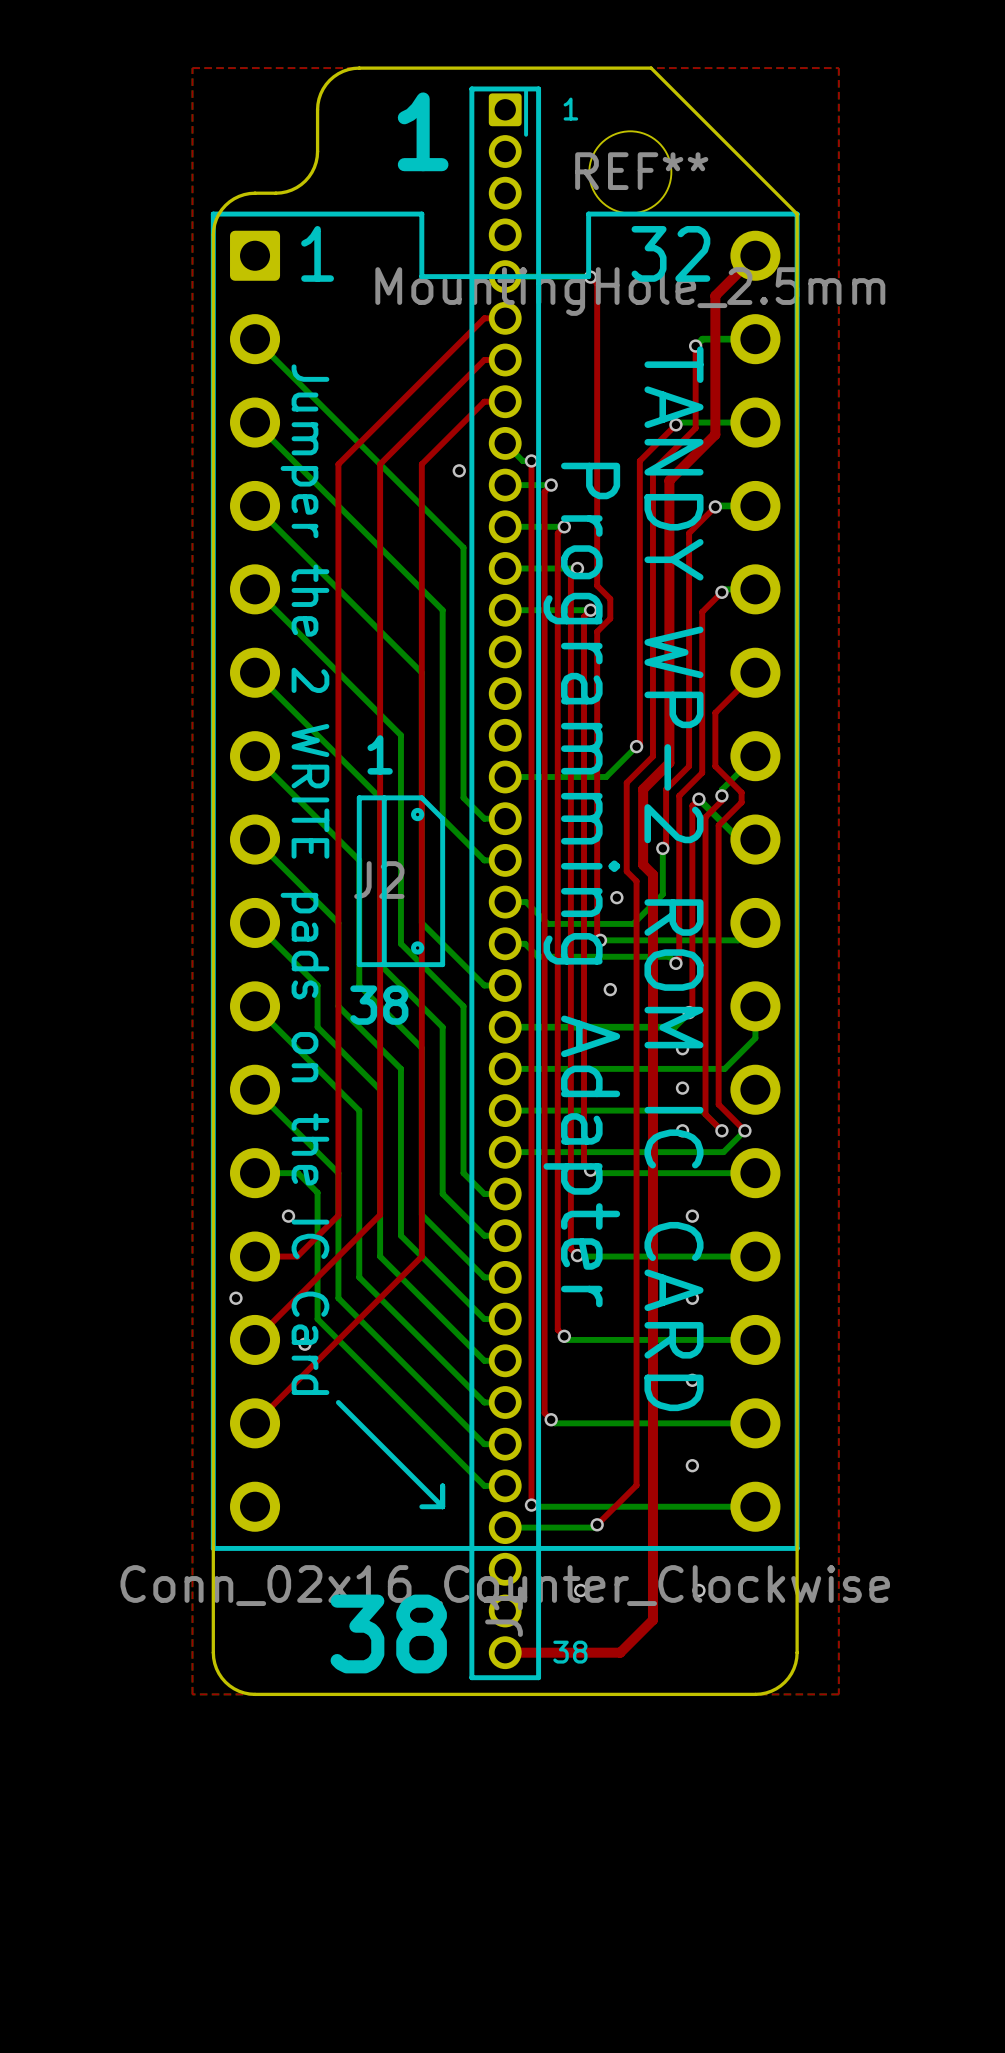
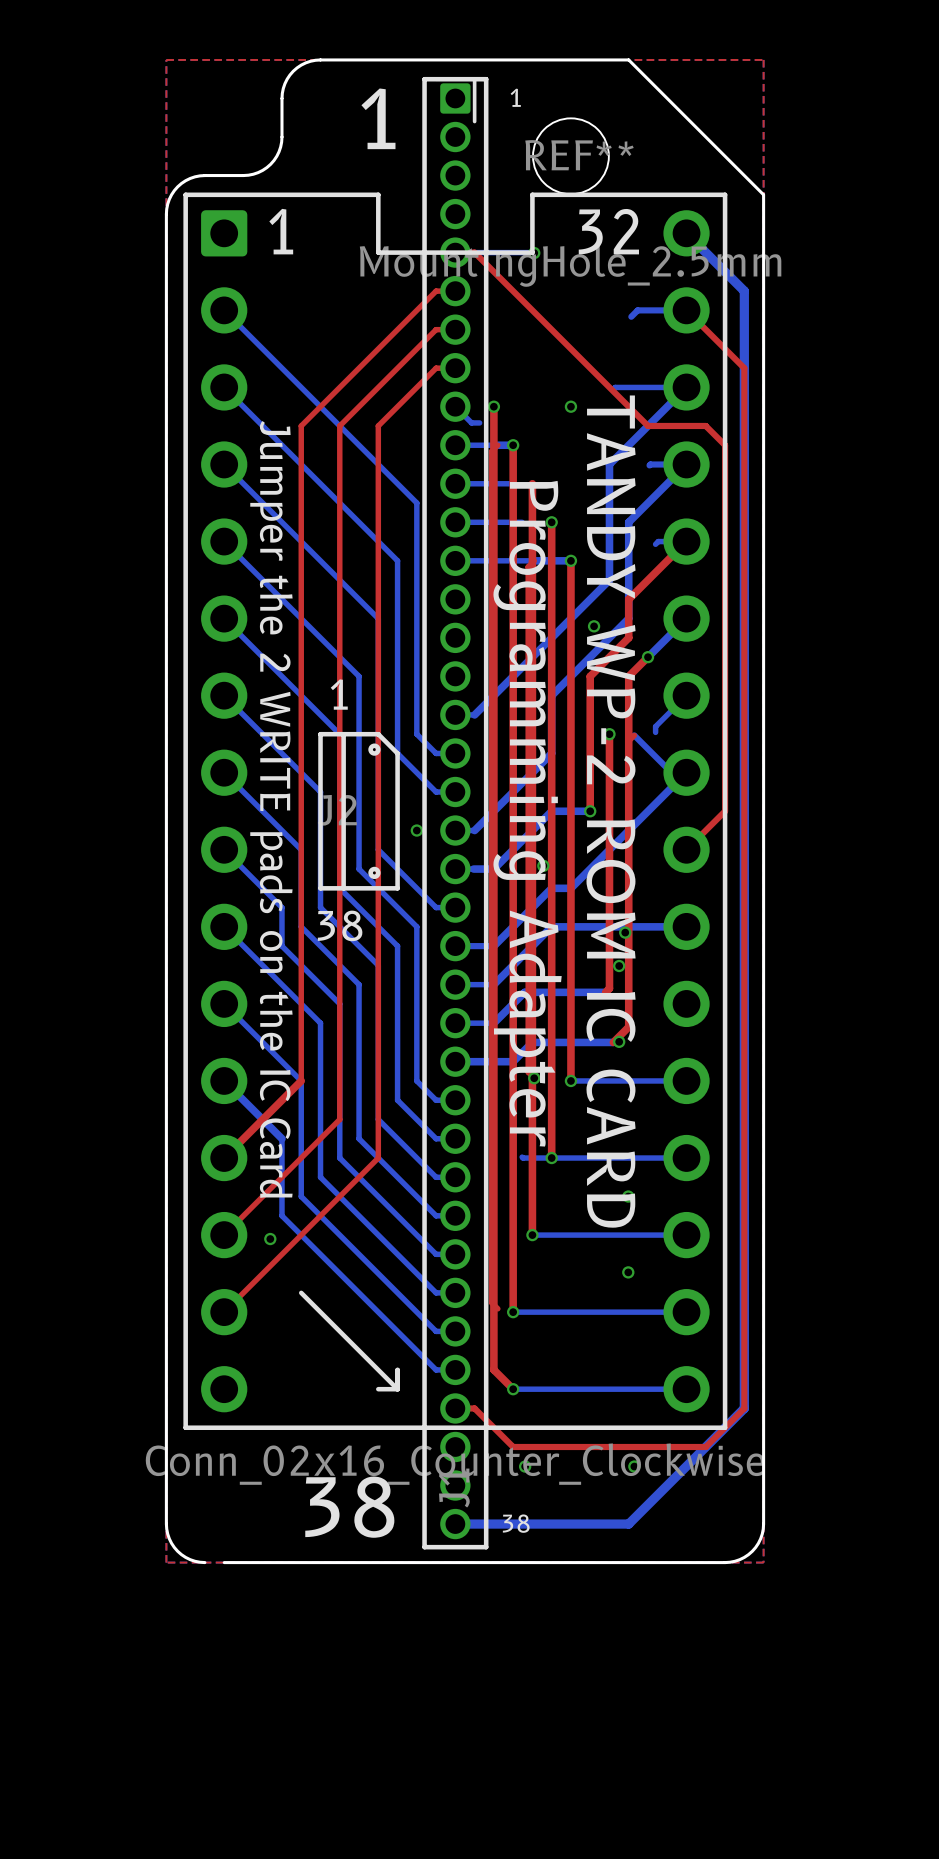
board edge: (651, 68) (797, 214) (797, 1652) (793, 1668) (784, 1682) (771, 1691) (755, 1694) -> (590, 59) (628, 59) (763, 194) (763, 1524) (758, 1543) (744, 1557) (730, 1562) (686, 1562)
board edge: (255, 193) (239, 196) (225, 205) (216, 218) (213, 234) (213, 1652) (216, 1668) (225, 1682) (239, 1691) (255, 1694) -> (224, 175) (199, 175) (185, 180) (171, 194) (166, 214) (166, 1524) (169, 1538) (177, 1551) (190, 1559) (204, 1562)
bottom track: none -> (686, 233) (744, 291) (744, 1408) (628, 1524) (455, 1524)
top track: (755, 255) (715, 295) (715, 434) (669, 480) (669, 763) (643, 789) (643, 864) (652, 874) (652, 1620) (620, 1652) (505, 1652) -> none
top track: none -> (455, 252) (474, 252) (648, 425) (705, 425) (725, 445) (725, 811) (686, 849)
top track: (590, 277) (597, 283) (597, 585) (610, 598) (610, 618) (597, 631) (597, 937) (600, 940) -> none
top track: none -> (686, 310) (744, 368) (744, 1408) (705, 1446) (513, 1446) (474, 1408) (455, 1408)
top track: (695, 346) (695, 428) (652, 470) (652, 756) (626, 782) (626, 871) (636, 881) (636, 1485) (597, 1524) -> none
via: (695, 346) -> none
top track: (675, 424) (639, 460) (639, 743) (636, 746) -> none
via: (675, 424) -> none
top track: none -> (493, 406) (493, 1369) (513, 1389)
via: none -> (493, 406)
via: none -> (570, 406)
top track: (531, 460) (531, 1505) -> none
via: (531, 460) -> none
via: (459, 470) -> none
bottom track: none -> (497, 445) (513, 445)
via position: (551, 485) -> (513, 445)
top track: none -> (513, 445) (513, 1312)
top track: (715, 506) (689, 533) (689, 766) (666, 789) (666, 845) (662, 848) -> none
via: (715, 506) -> none
top track: (564, 526) (557, 533) (557, 1329) (564, 1336) -> none
via: (564, 526) -> none
top track: none -> (532, 483) (532, 1235)
top track: (577, 568) (570, 575) (570, 1248) (577, 1255) -> none
via: (577, 568) -> none
top track: none -> (551, 522) (551, 1158)
via: none -> (551, 522)
top track: none -> (686, 541) (628, 599) (628, 637) (590, 676) (590, 811)
top track: (721, 592) (702, 612) (702, 772) (679, 795) (679, 960) (675, 963) -> none
via: (721, 592) -> none
bottom track: none -> (534, 560) (570, 560)
via: (590, 610) -> none
top track: none -> (570, 560) (570, 1080)
via: none -> (570, 560)
bottom track: none -> (686, 618) (648, 657)
top track: (755, 672) (715, 712) (715, 766) (741, 792) (741, 802) (718, 825) (718, 1104) (744, 1130) -> none
via: none -> (594, 626)
top track: none -> (648, 657) (628, 676) (628, 1027) (613, 1042)
via: none -> (648, 657)
bottom track: (636, 746) (606, 777) (526, 777) -> (686, 387) (609, 464) (609, 580) (474, 714)
via: (636, 746) -> none
top track: (721, 795) (721, 800) (705, 817) (705, 1114) (721, 1130) -> none
via: (721, 795) -> none
top track: none -> (609, 734) (609, 988) (605, 992)
via: none -> (609, 734)
via: (698, 799) -> none
bottom track: (662, 848) (662, 894) (633, 923) (547, 923) (526, 902) -> (686, 464) (628, 522) (628, 618) (551, 695) (551, 753) (474, 830)
via: (662, 848) -> none
via: none -> (590, 811)
via: (616, 897) -> none
via: none -> (416, 830)
bottom track: (755, 922) (738, 940) (600, 940) -> none
bottom track: (525, 943) (538, 956) (669, 956) (675, 963) -> (473, 869) (493, 869) (551, 811) (590, 811)
via: (675, 963) -> none
via: (610, 989) -> none
bottom track: (755, 1006) (755, 1038) (724, 1068) (546, 1068) -> (686, 926) (551, 926) (493, 984)
bottom track: (689, 1012) (674, 1027) (546, 1027) -> (685, 773) (570, 888) (551, 888) (493, 946)
via: (682, 1088) -> none
bottom track: (546, 1110) (701, 1110) (721, 1130) -> (493, 1023) (524, 992) (605, 992)
via: (721, 1130) -> none
bottom track: (744, 1130) (723, 1152) (505, 1152) -> (613, 1042) (532, 1042) (513, 1061) (455, 1061)
via: (744, 1130) -> none
bottom track: (590, 1170) (593, 1173) (630, 1173) -> none
bottom track: (255, 1173) (298, 1173) (317, 1192) (317, 1235) -> (224, 1080) (281, 1138)
top track: (338, 1173) (338, 1215) (297, 1256) (255, 1256) -> (301, 1080) (224, 1158)
via: none -> (570, 1080)
via: (288, 1216) -> none
via: (692, 1216) -> none
via position: (577, 1255) -> (551, 1158)
via: (235, 1298) -> none
bottom track: (564, 1336) (567, 1339) (588, 1339) -> none
via position: (564, 1336) -> (532, 1235)
bottom track: (551, 1419) (554, 1423) (567, 1423) -> none
via position: (551, 1419) -> (513, 1312)
via: (692, 1465) -> none
bottom track: (531, 1505) (533, 1506) (567, 1506) -> none
via: (531, 1505) -> none
via: none -> (513, 1389)
bottom track: (597, 1524) (594, 1527) (505, 1527) -> none
via: (597, 1524) -> none

